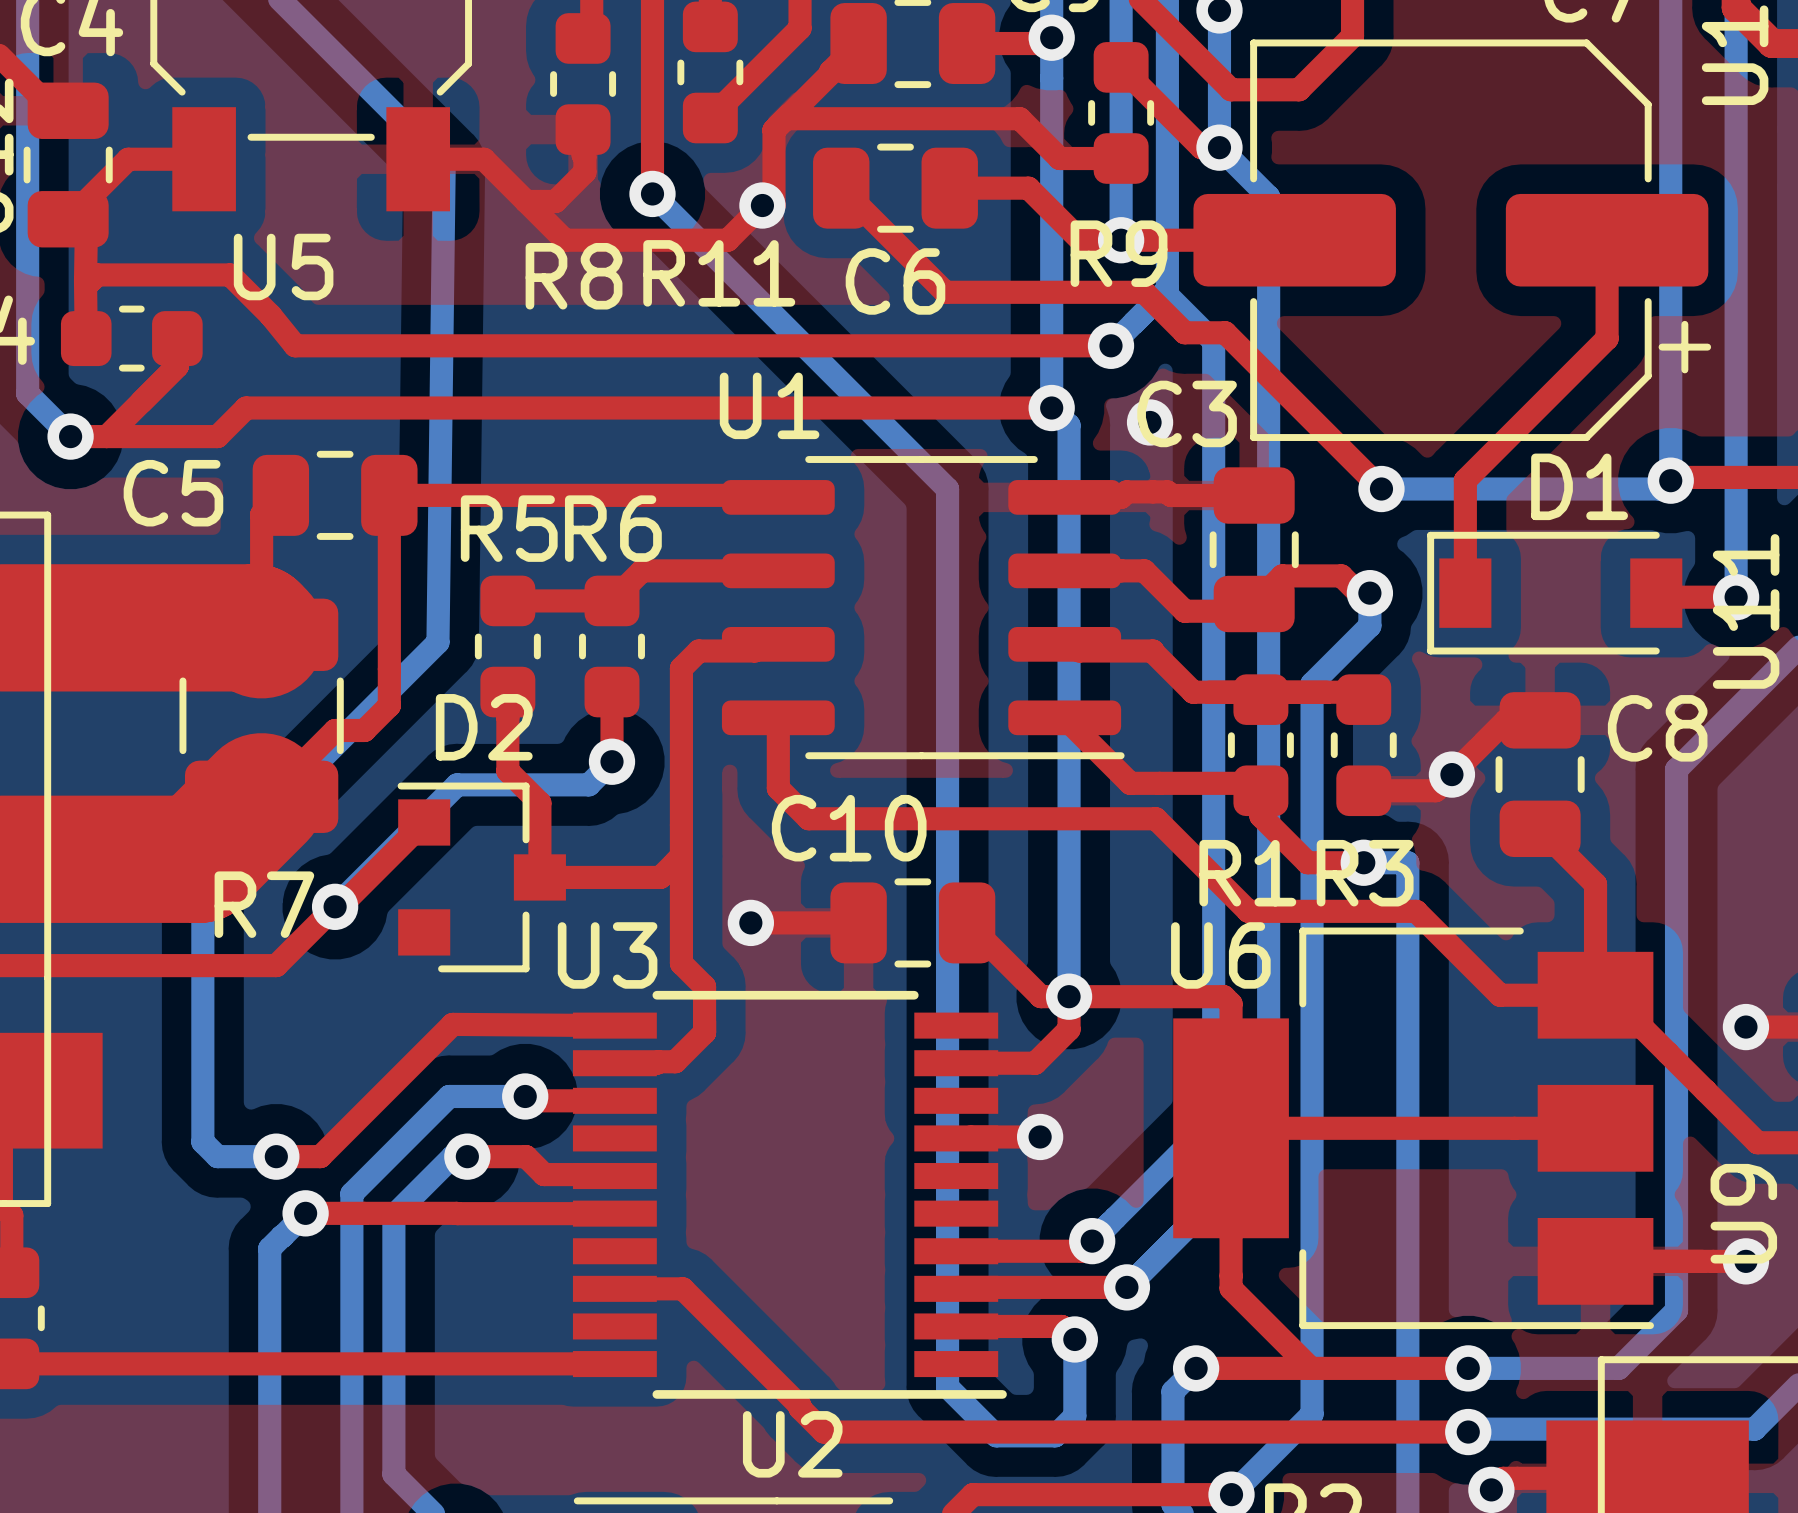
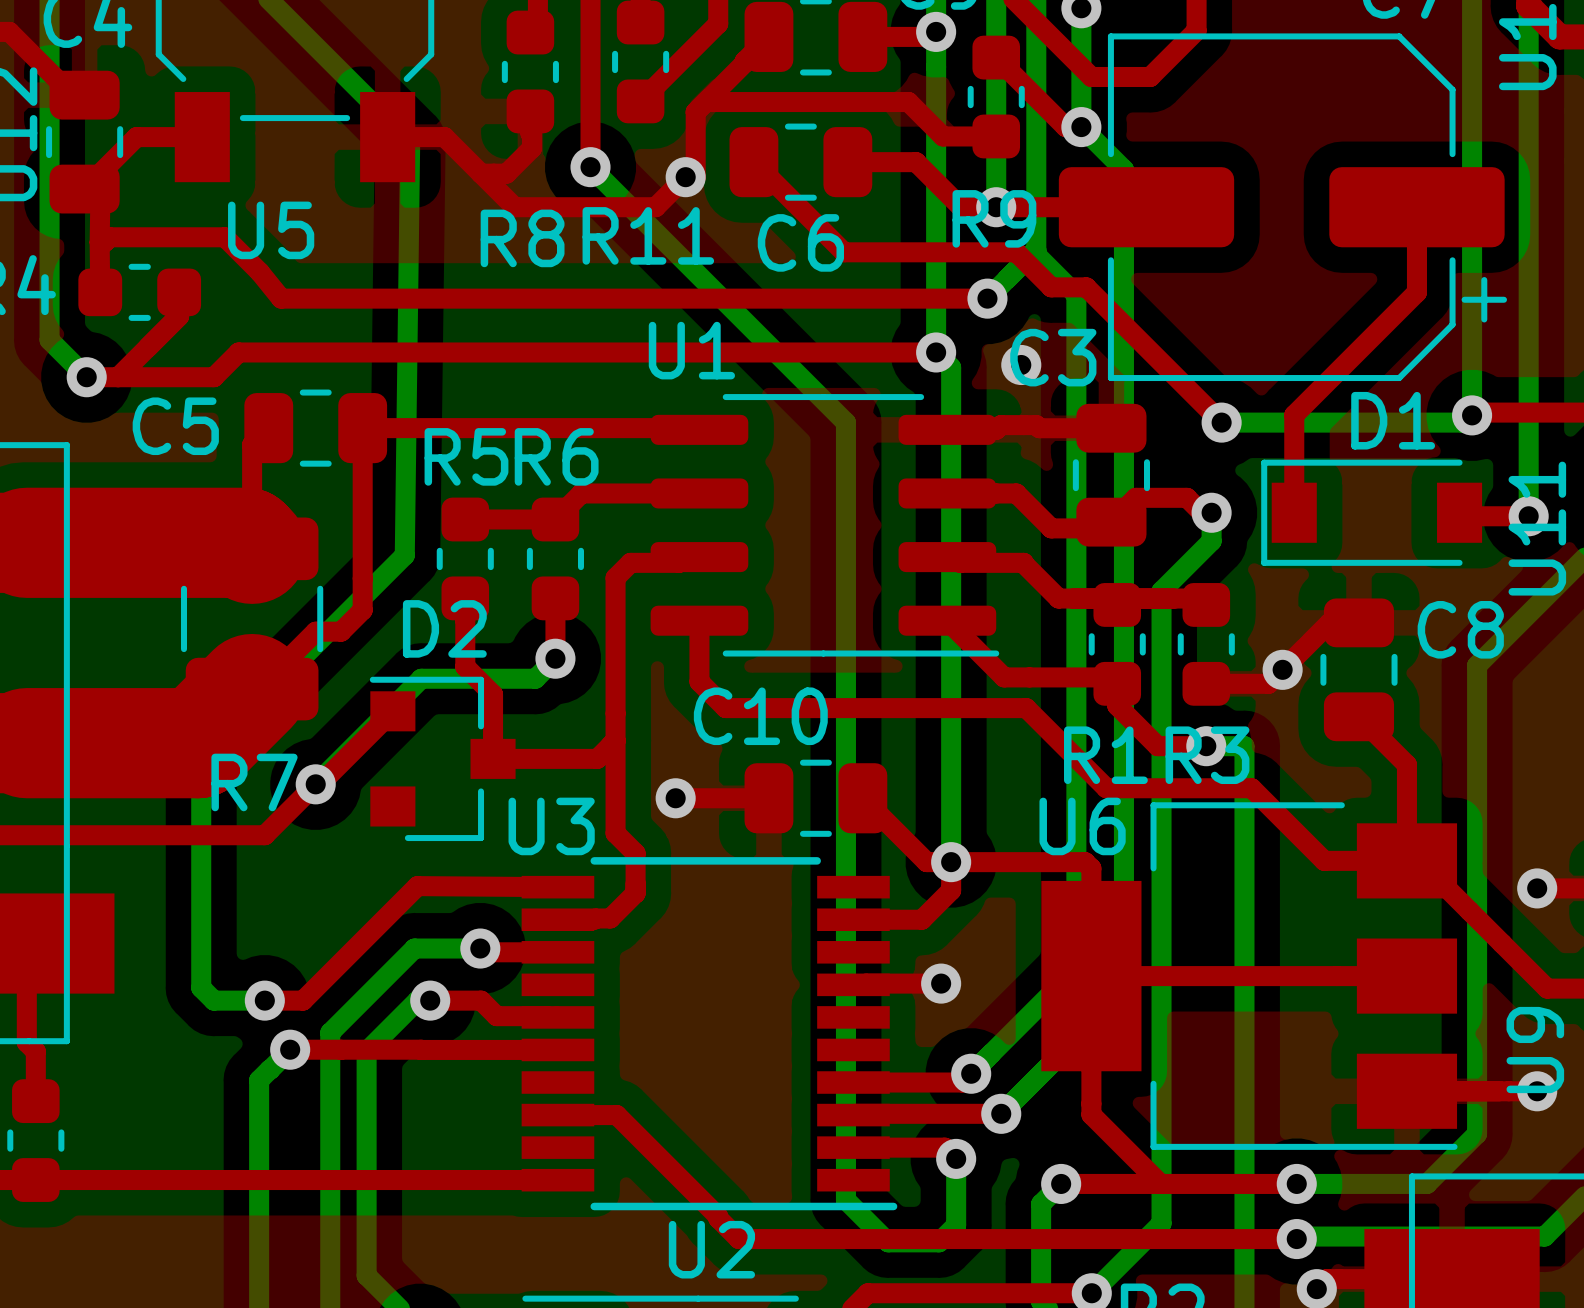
via position: (1040, 1136) -> (941, 983)

